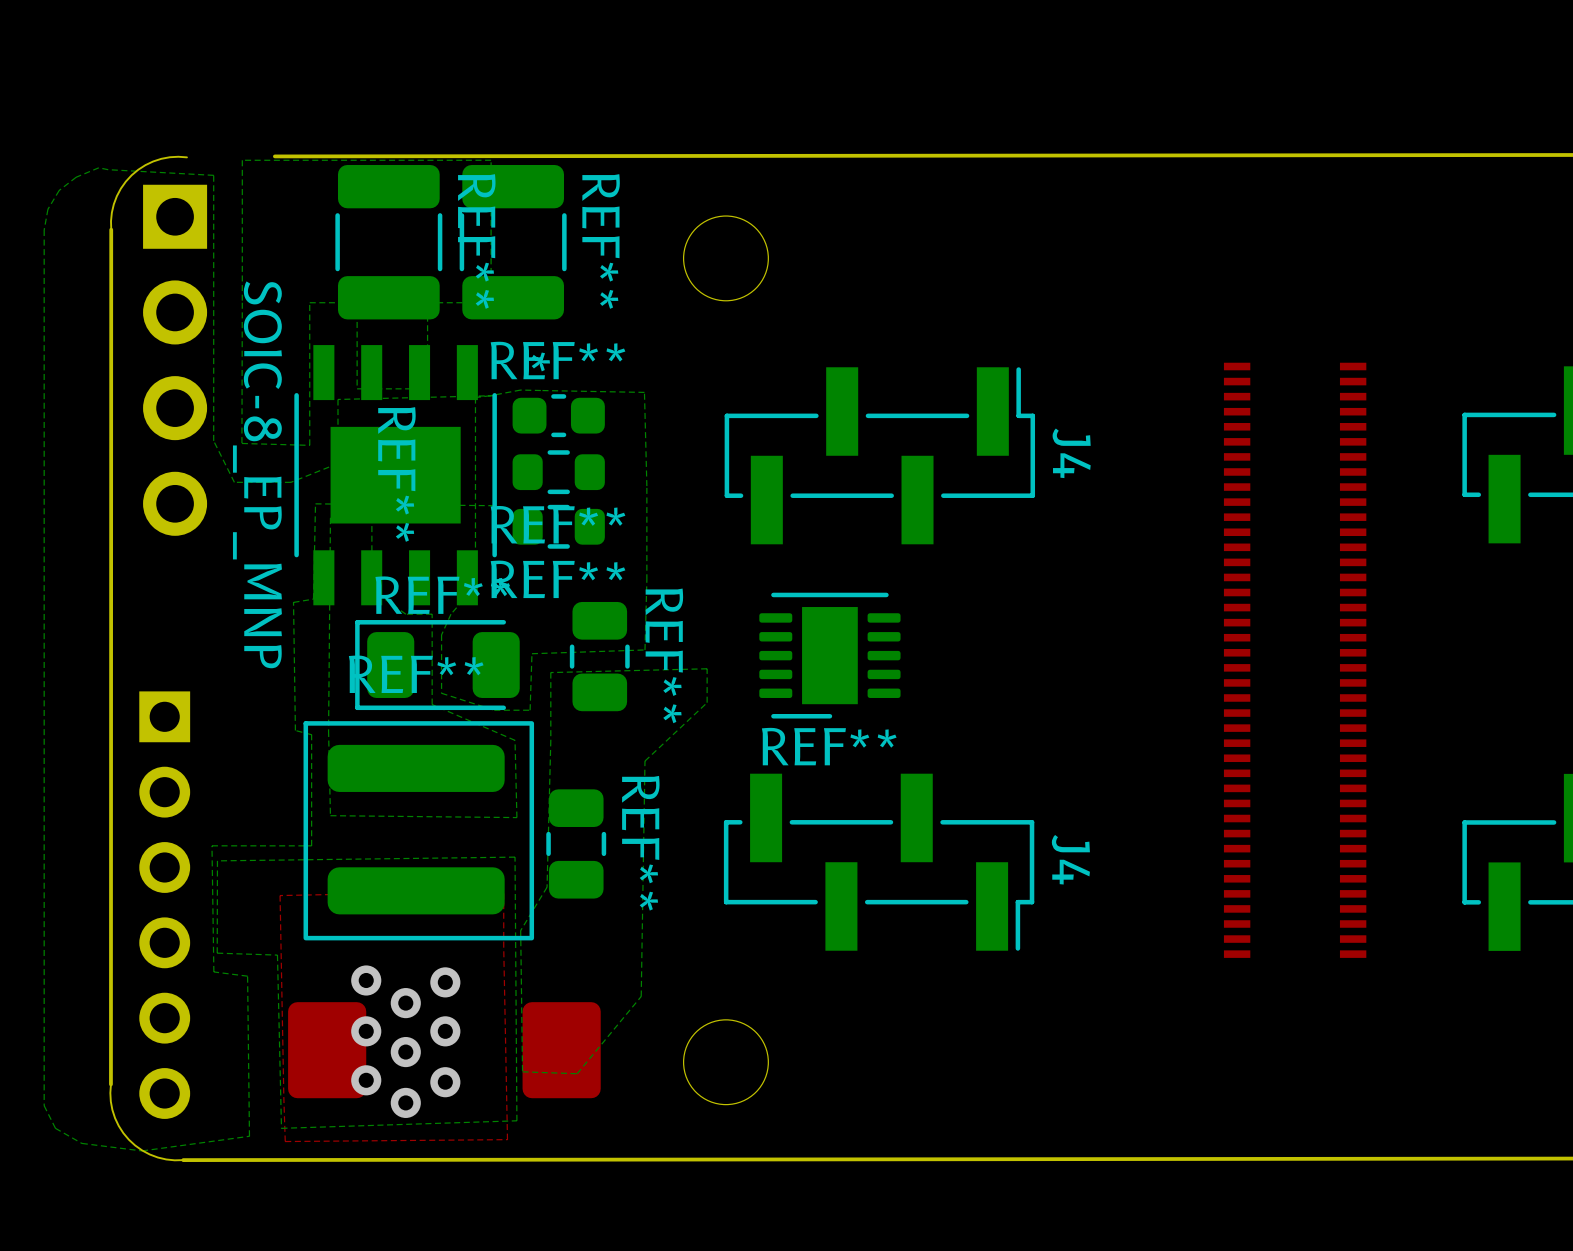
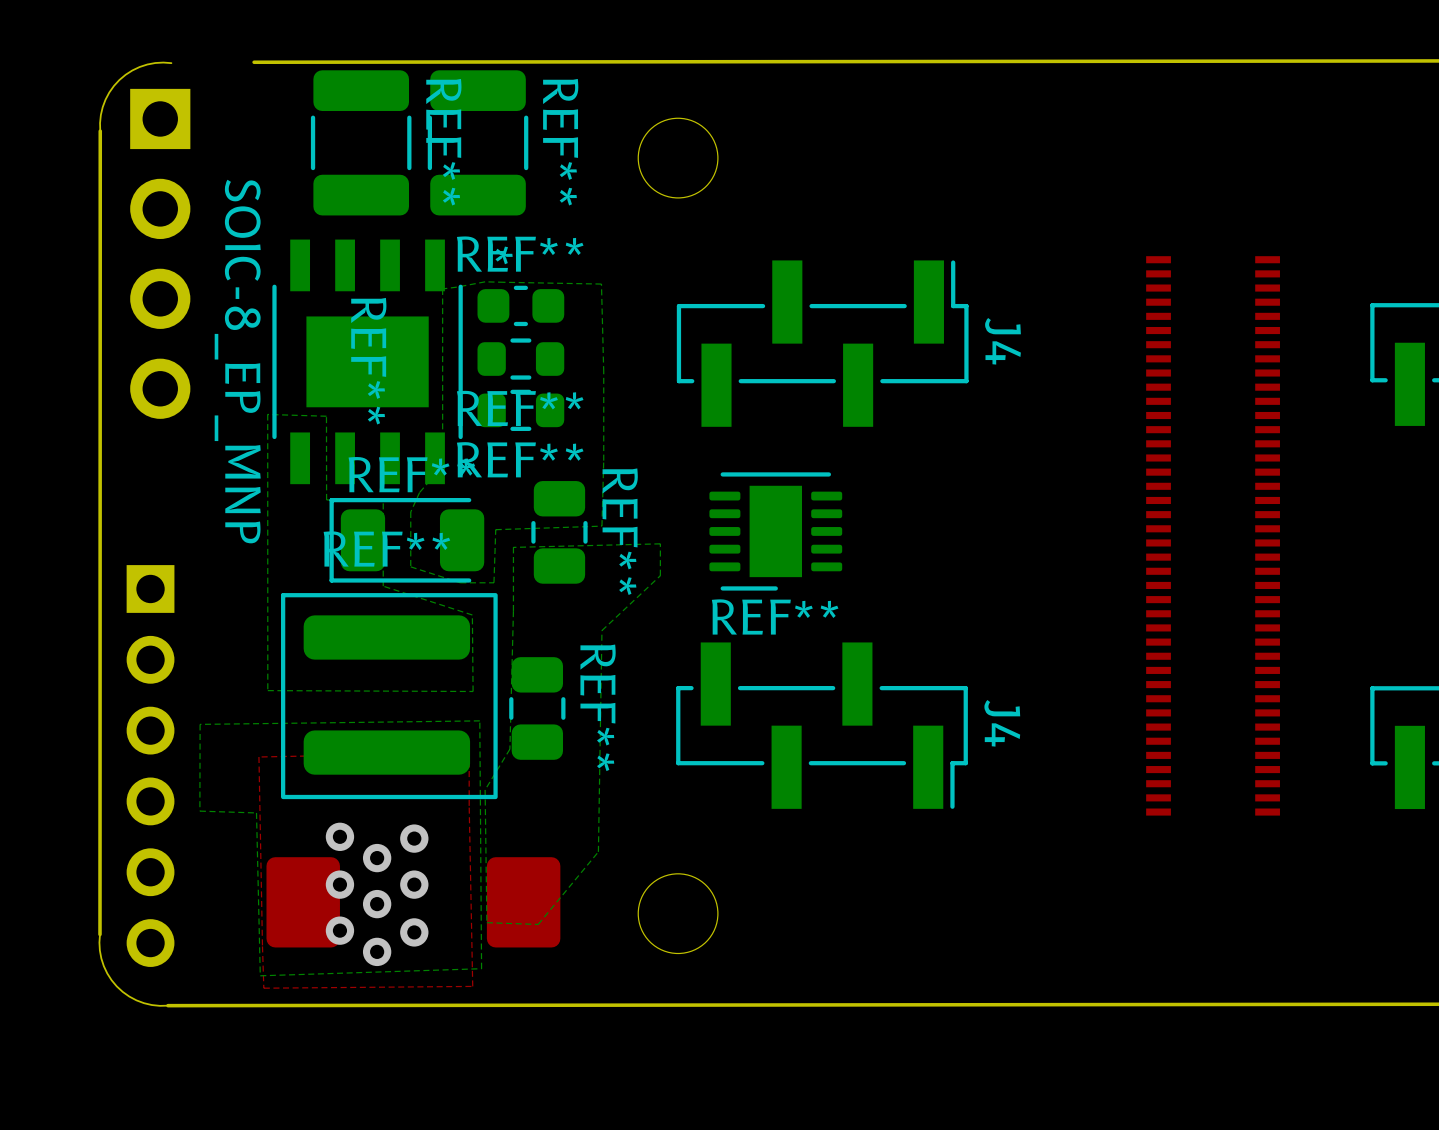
bottom zone outline: (491, 160) (491, 302) (427, 302) (427, 388) (357, 388) (357, 302) (309, 302) (309, 445) (241, 443) (242, 160) (491, 160) -> none
bottom zone outline: (98, 167) (213, 175) (213, 440) (234, 482) (290, 482) (337, 463) (337, 399) (494, 395) (494, 505) (315, 503) (313, 599) (293, 602) (295, 730) (311, 734) (311, 845) (211, 845) (213, 971) (247, 976) (249, 1136) (142, 1150) (81, 1143) (55, 1128) (44, 1105) (44, 229) (47, 209) (59, 190) (76, 177) (98, 167) -> none
bottom zone outline: (330, 518) (371, 520) (371, 589) (405, 614) (432, 614) (432, 704) (515, 740) (516, 817) (330, 815) (328, 730) (330, 518) -> (267, 414) (326, 416) (326, 499) (383, 501) (383, 586) (472, 615) (473, 691) (267, 690) (267, 414)

